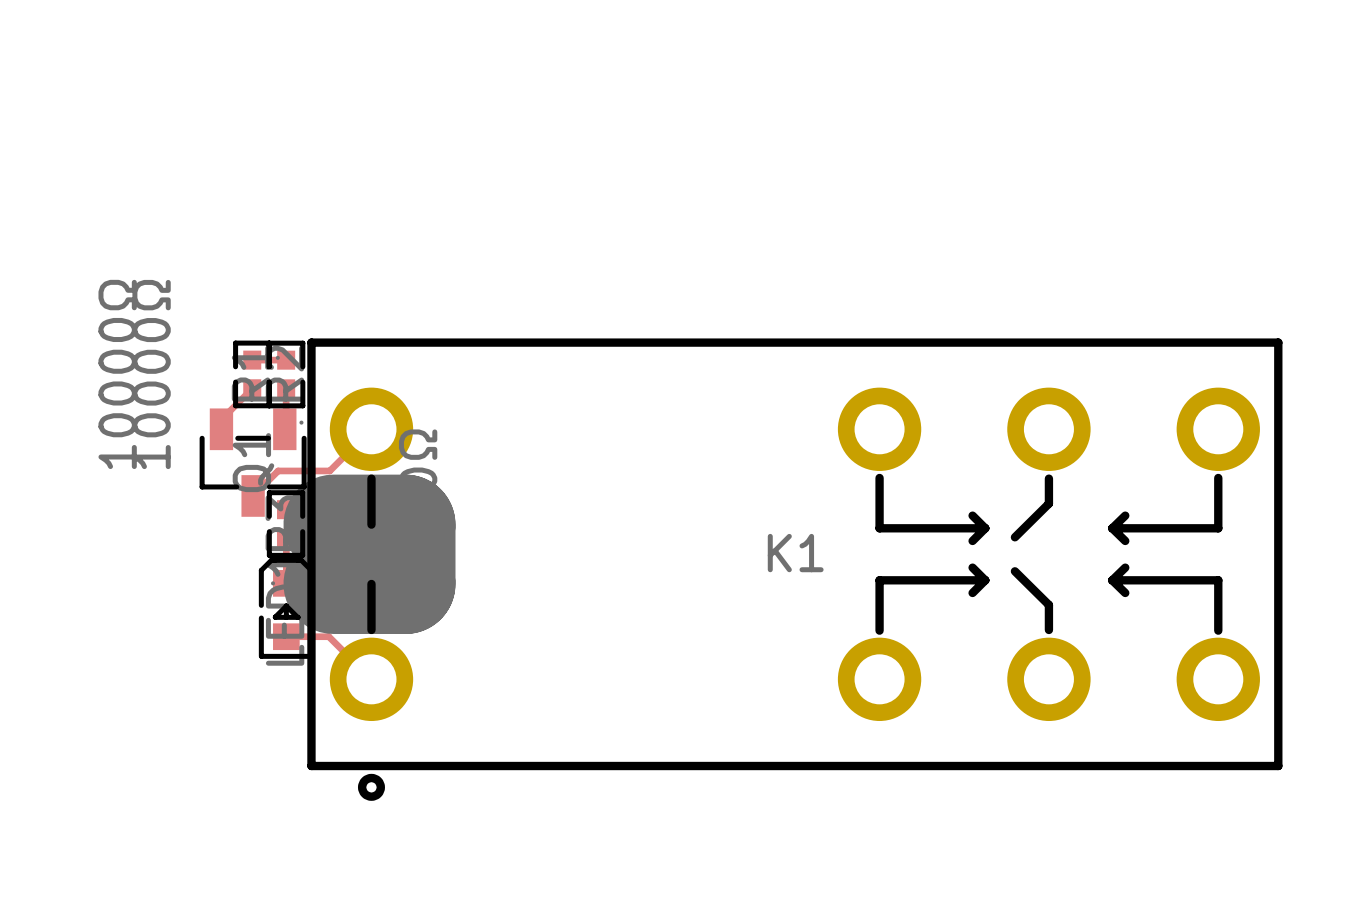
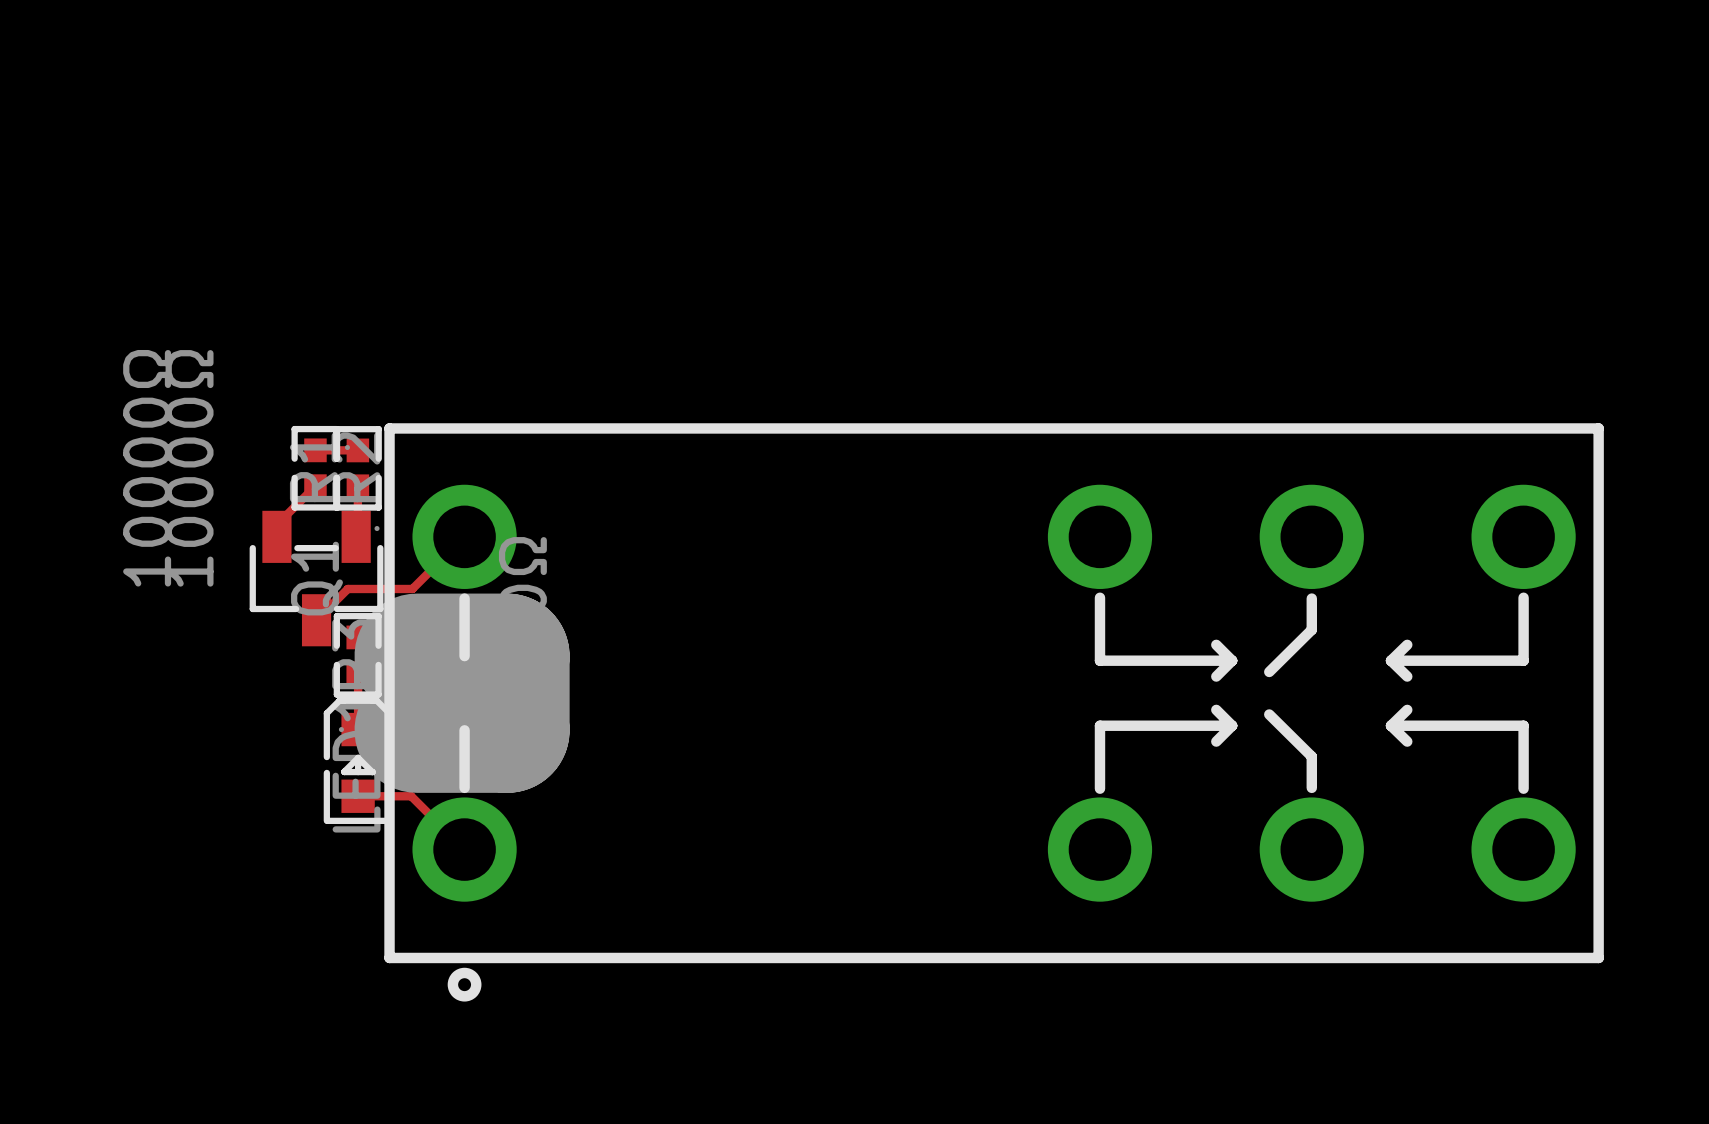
K1 name: K1 (795, 553) -> none

